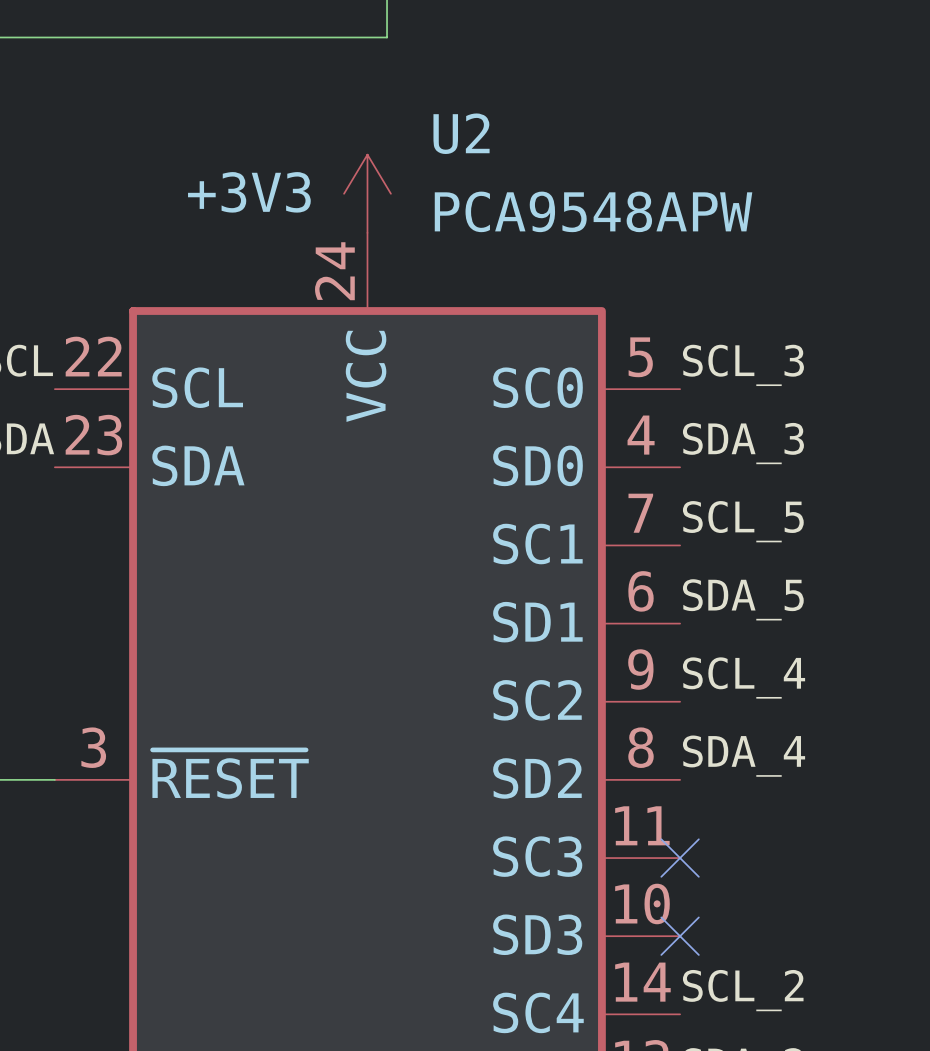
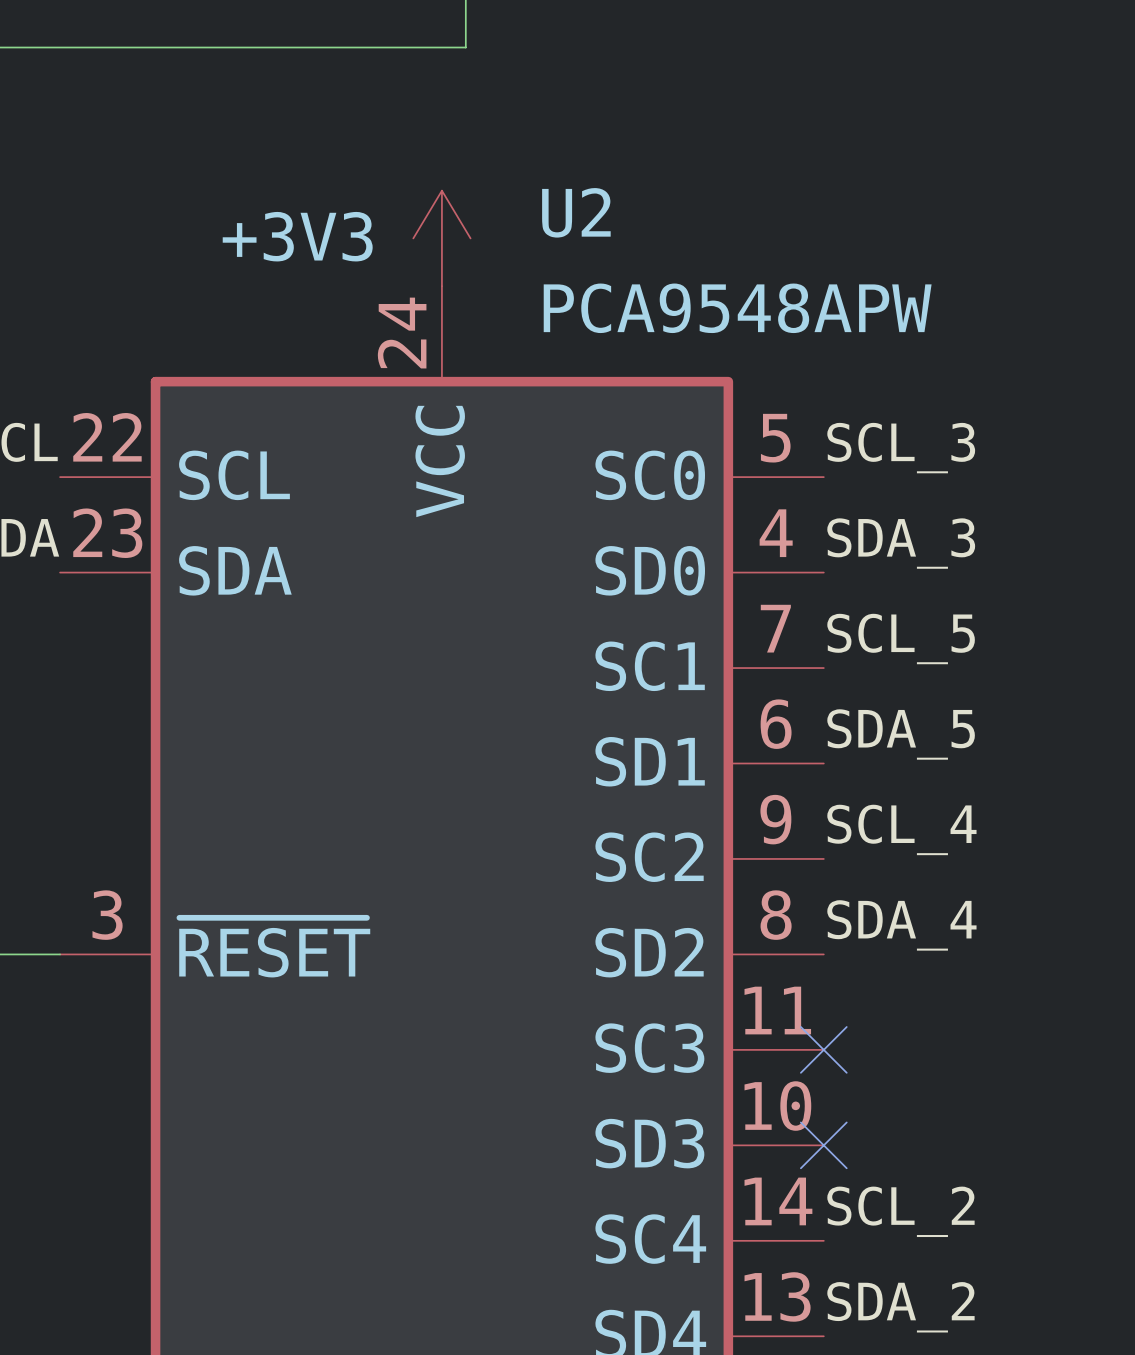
U2 name position: U2 (461, 133) -> U2 (576, 212)
U2 value position: PCA9548APW (593, 211) -> PCA9548APW (737, 308)

